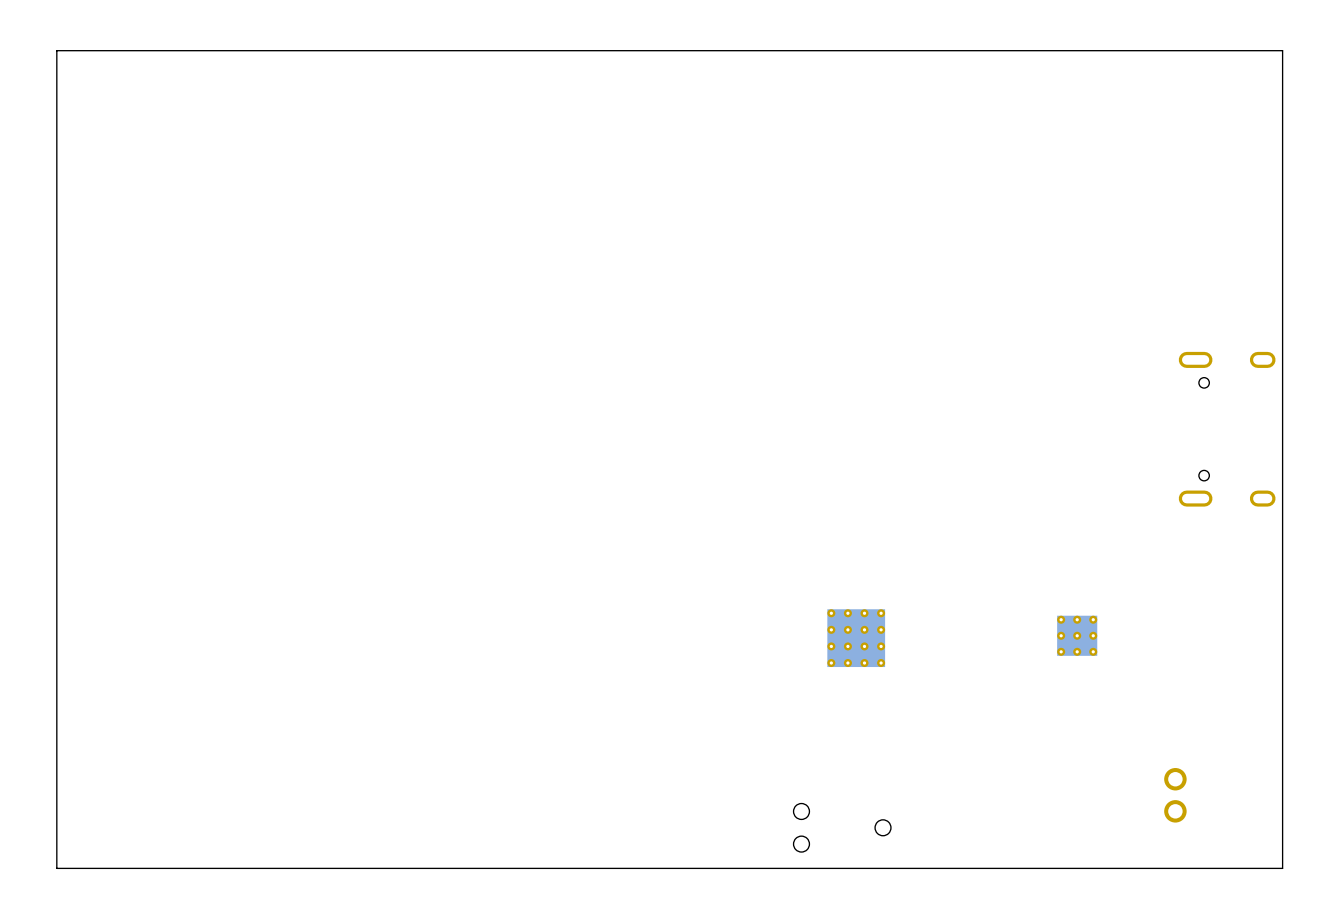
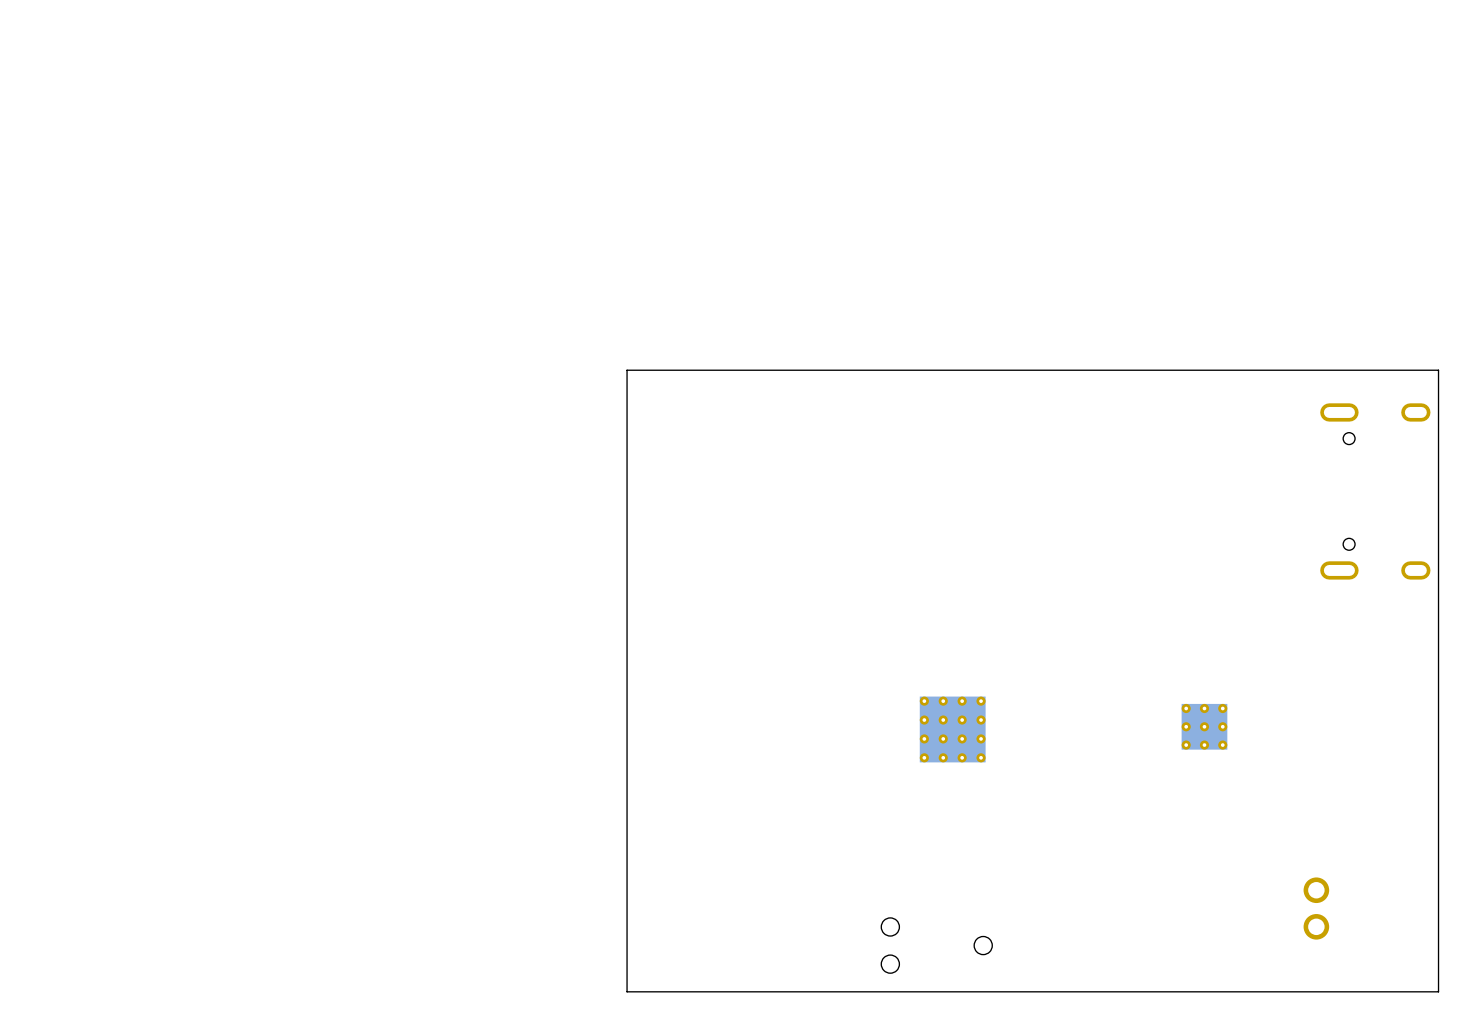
board edge: (1282, 322) (1282, 50) (56, 50) (56, 868) (570, 868) -> (1438, 370) (627, 370) (627, 991)

